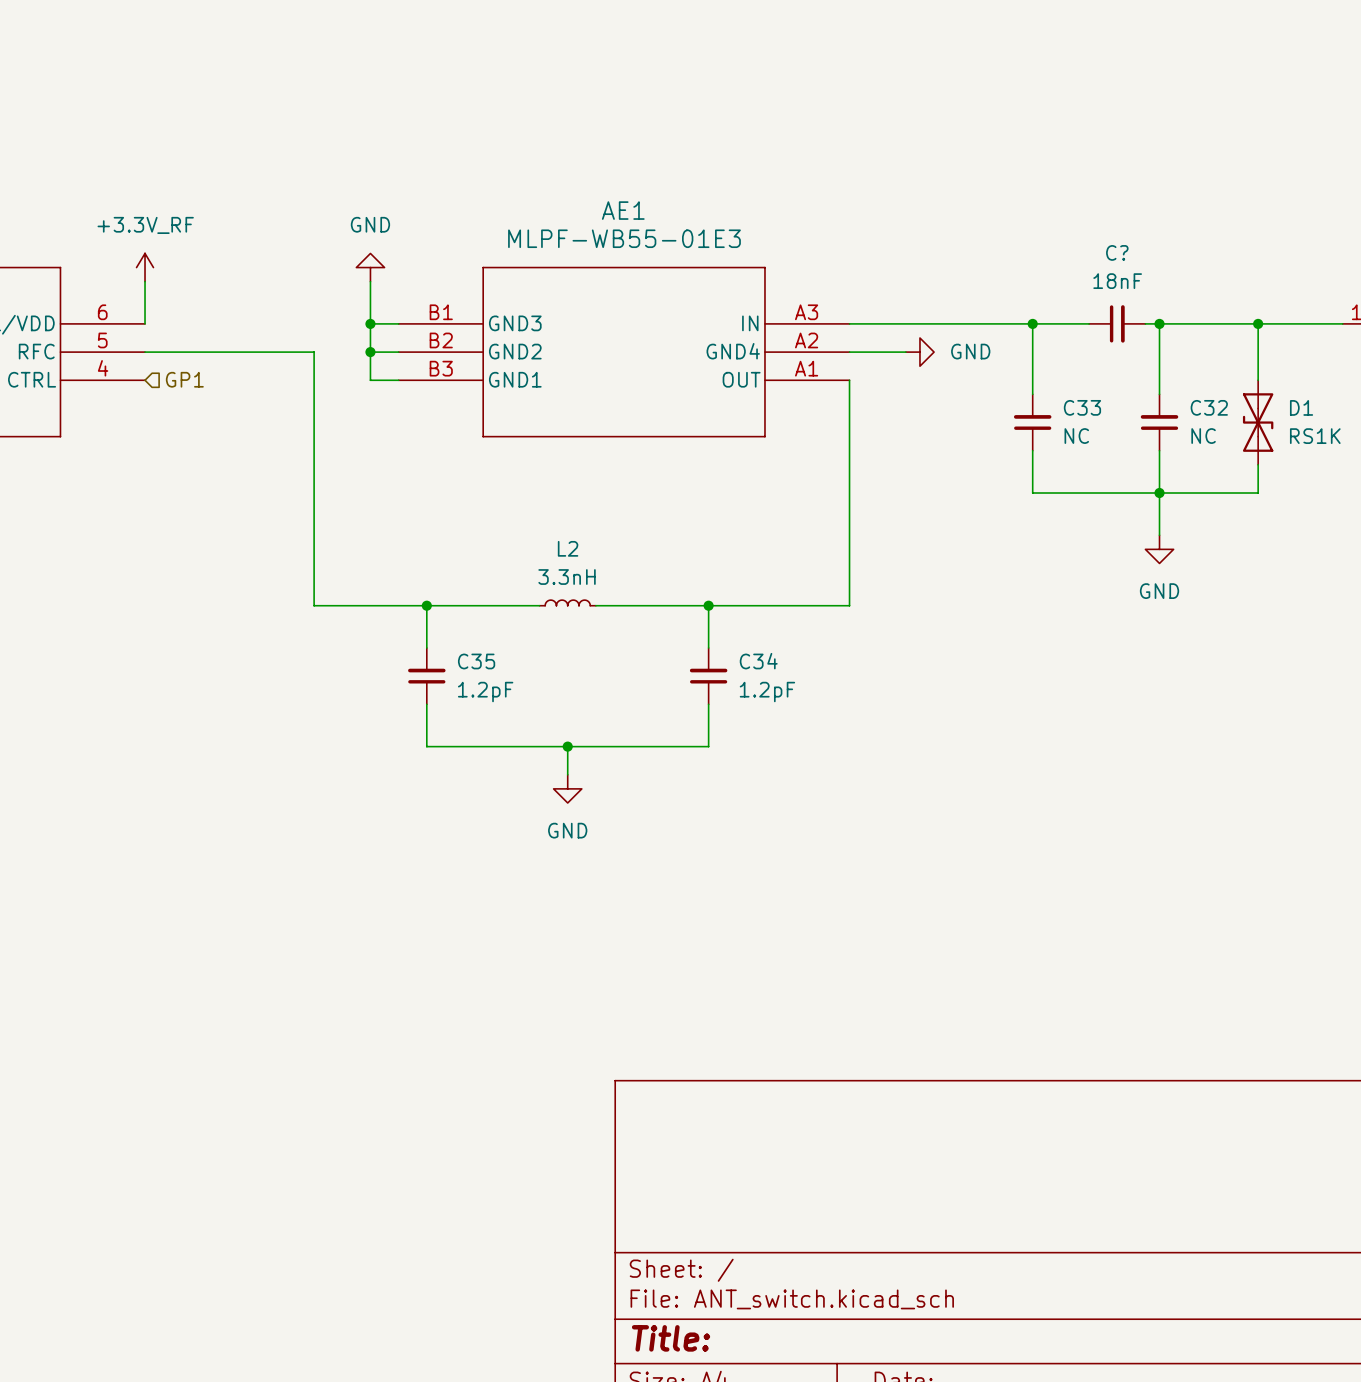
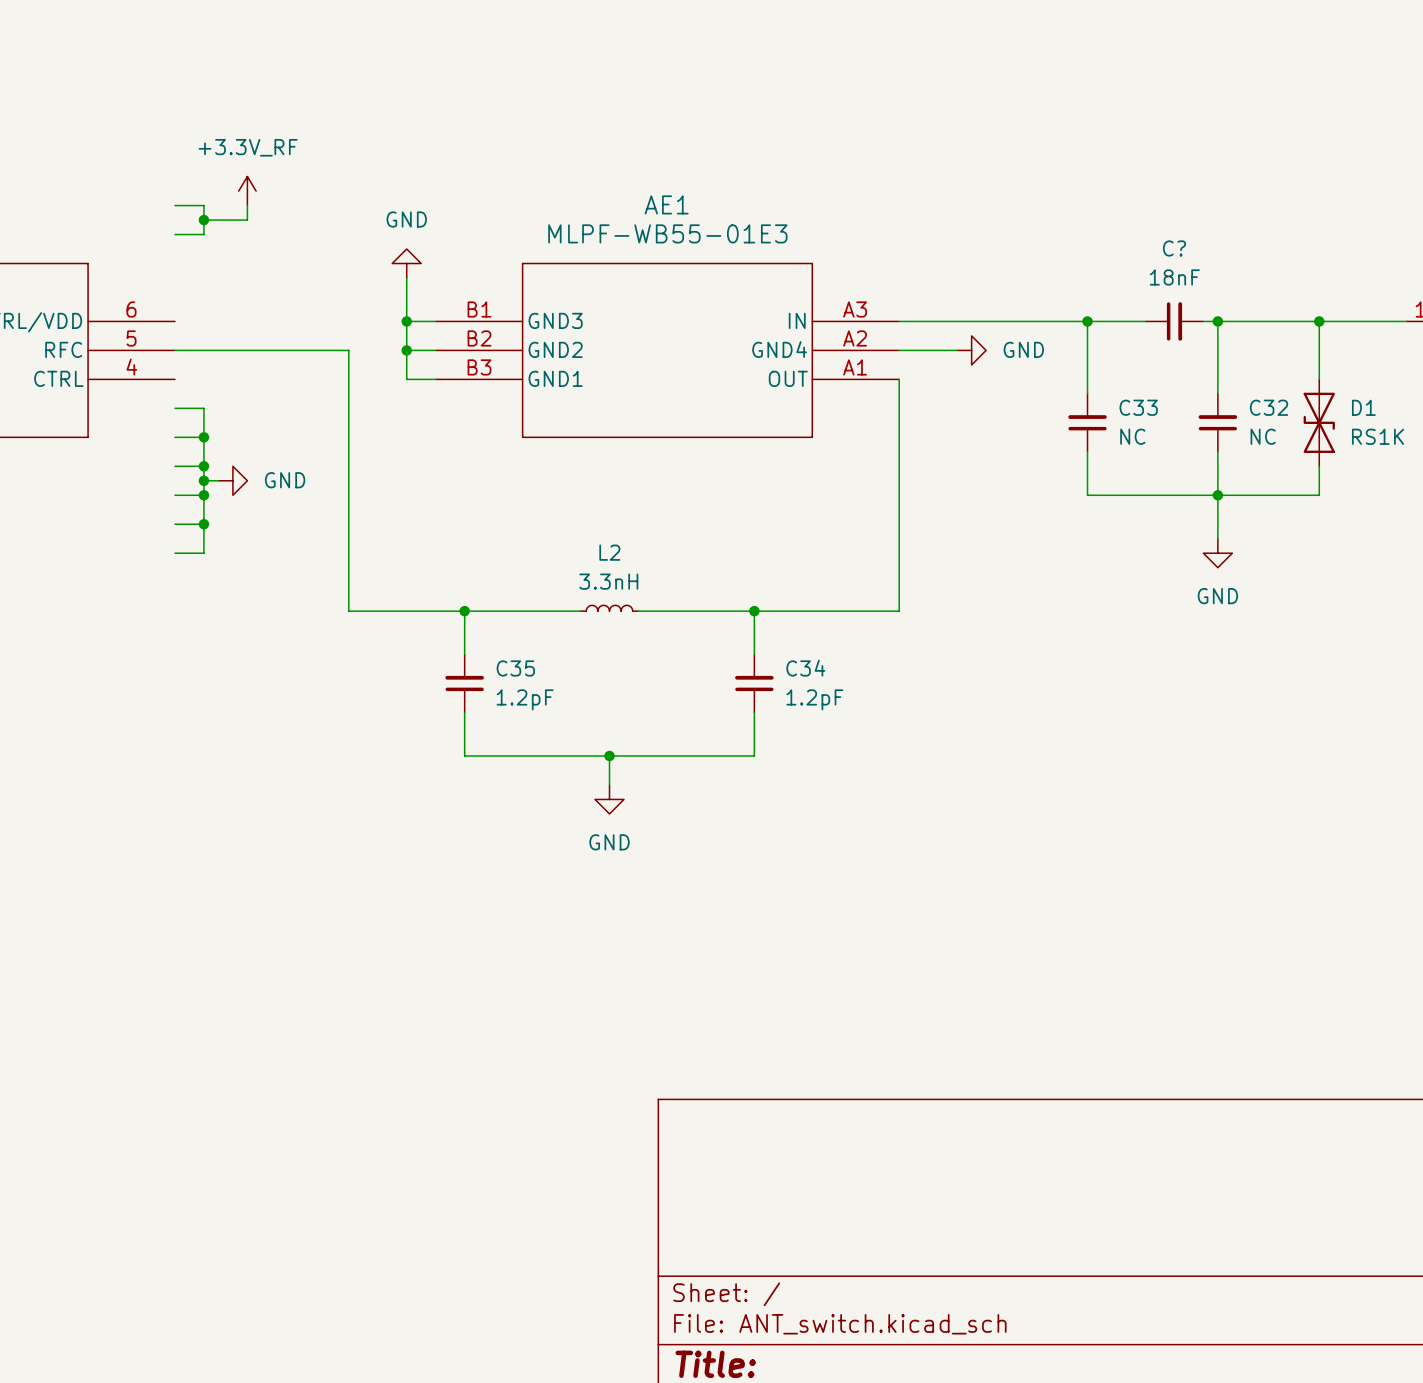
wire: none -> (174, 205) (203, 205) (203, 234) (174, 234)
wire: none -> (247, 205) (247, 220) (203, 220)
junction: none -> (203, 220)
power symbol position: +3.3V_RF (145, 267) -> +3.3V_RF (247, 191)
wire: (145, 281) (145, 323) -> none
hierarchical label: GP1 (184, 379) -> none
wire: none -> (174, 408) (203, 408) (203, 553) (174, 553)
wire: none -> (174, 437) (203, 437)
junction: none -> (203, 437)
wire: none -> (174, 466) (203, 466)
junction: none -> (203, 466)
wire: none -> (203, 480) (218, 480)
junction: none -> (203, 480)
power symbol: none -> GND (232, 480)
wire: none -> (174, 495) (203, 495)
junction: none -> (203, 495)
wire: none -> (174, 524) (203, 524)
junction: none -> (203, 524)

